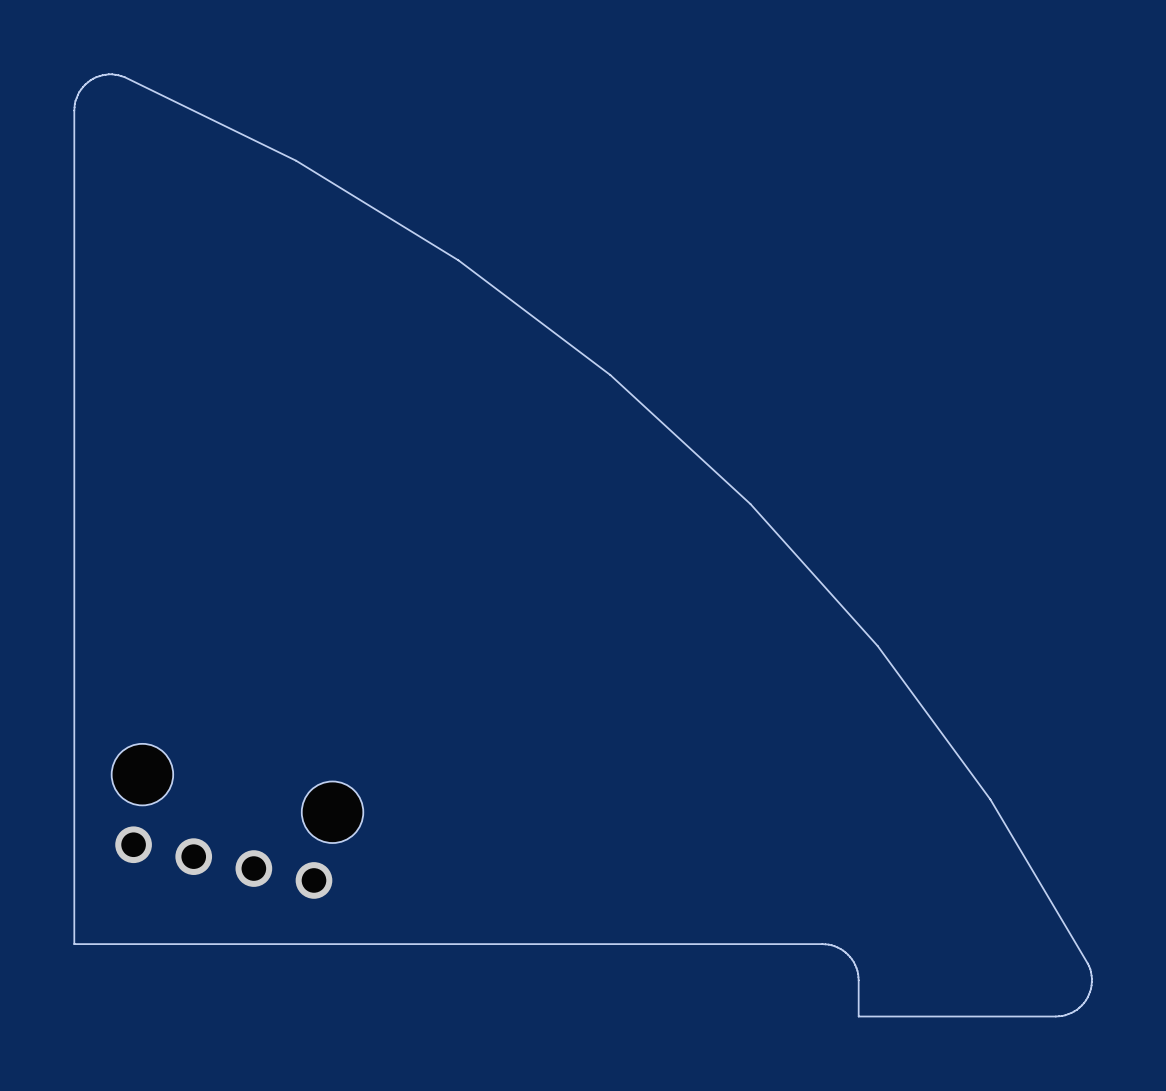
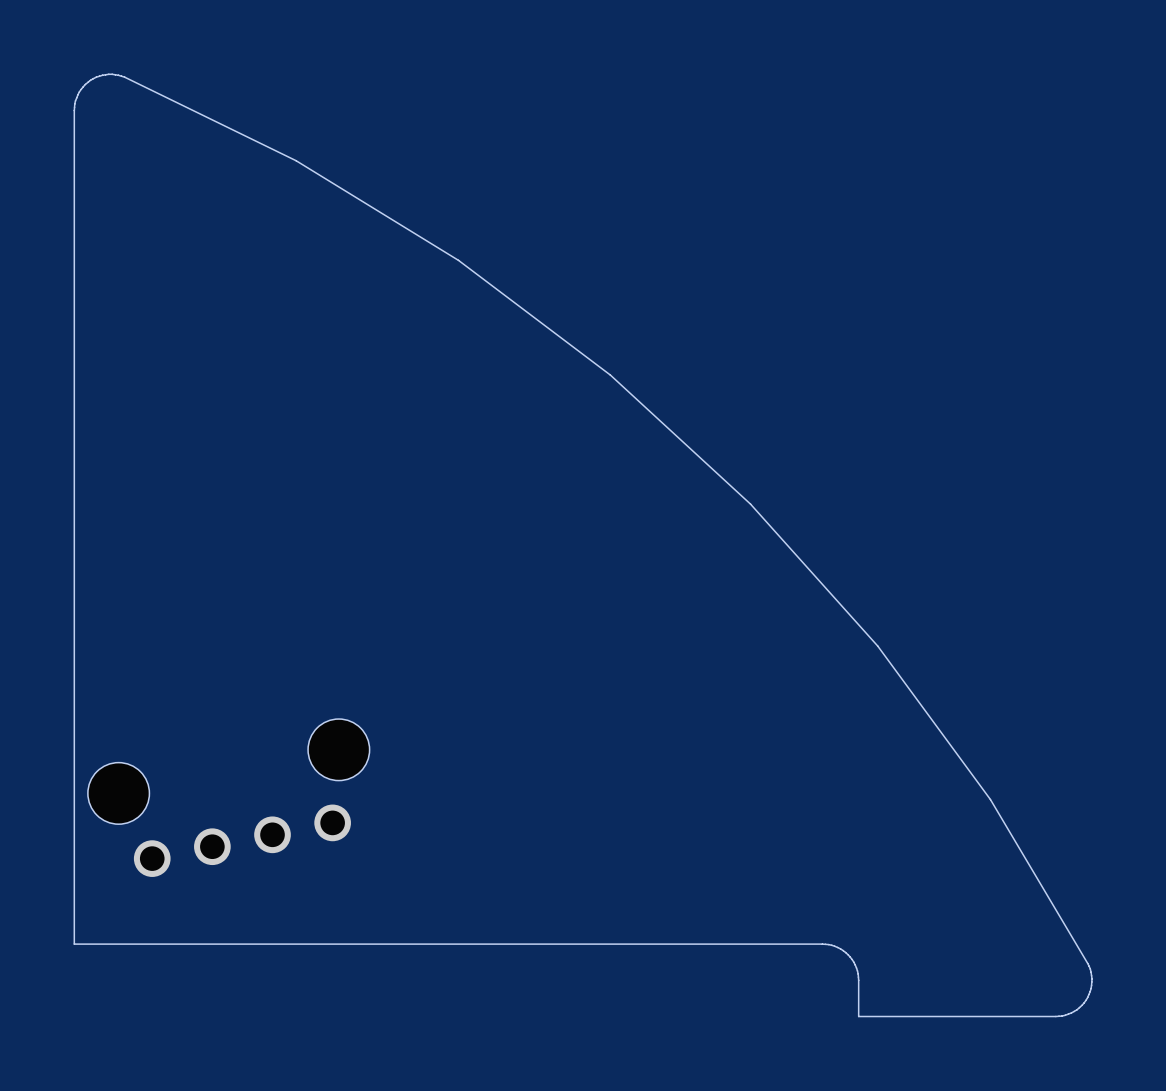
part: none -> (228, 797)
part: (237, 821) -> none

